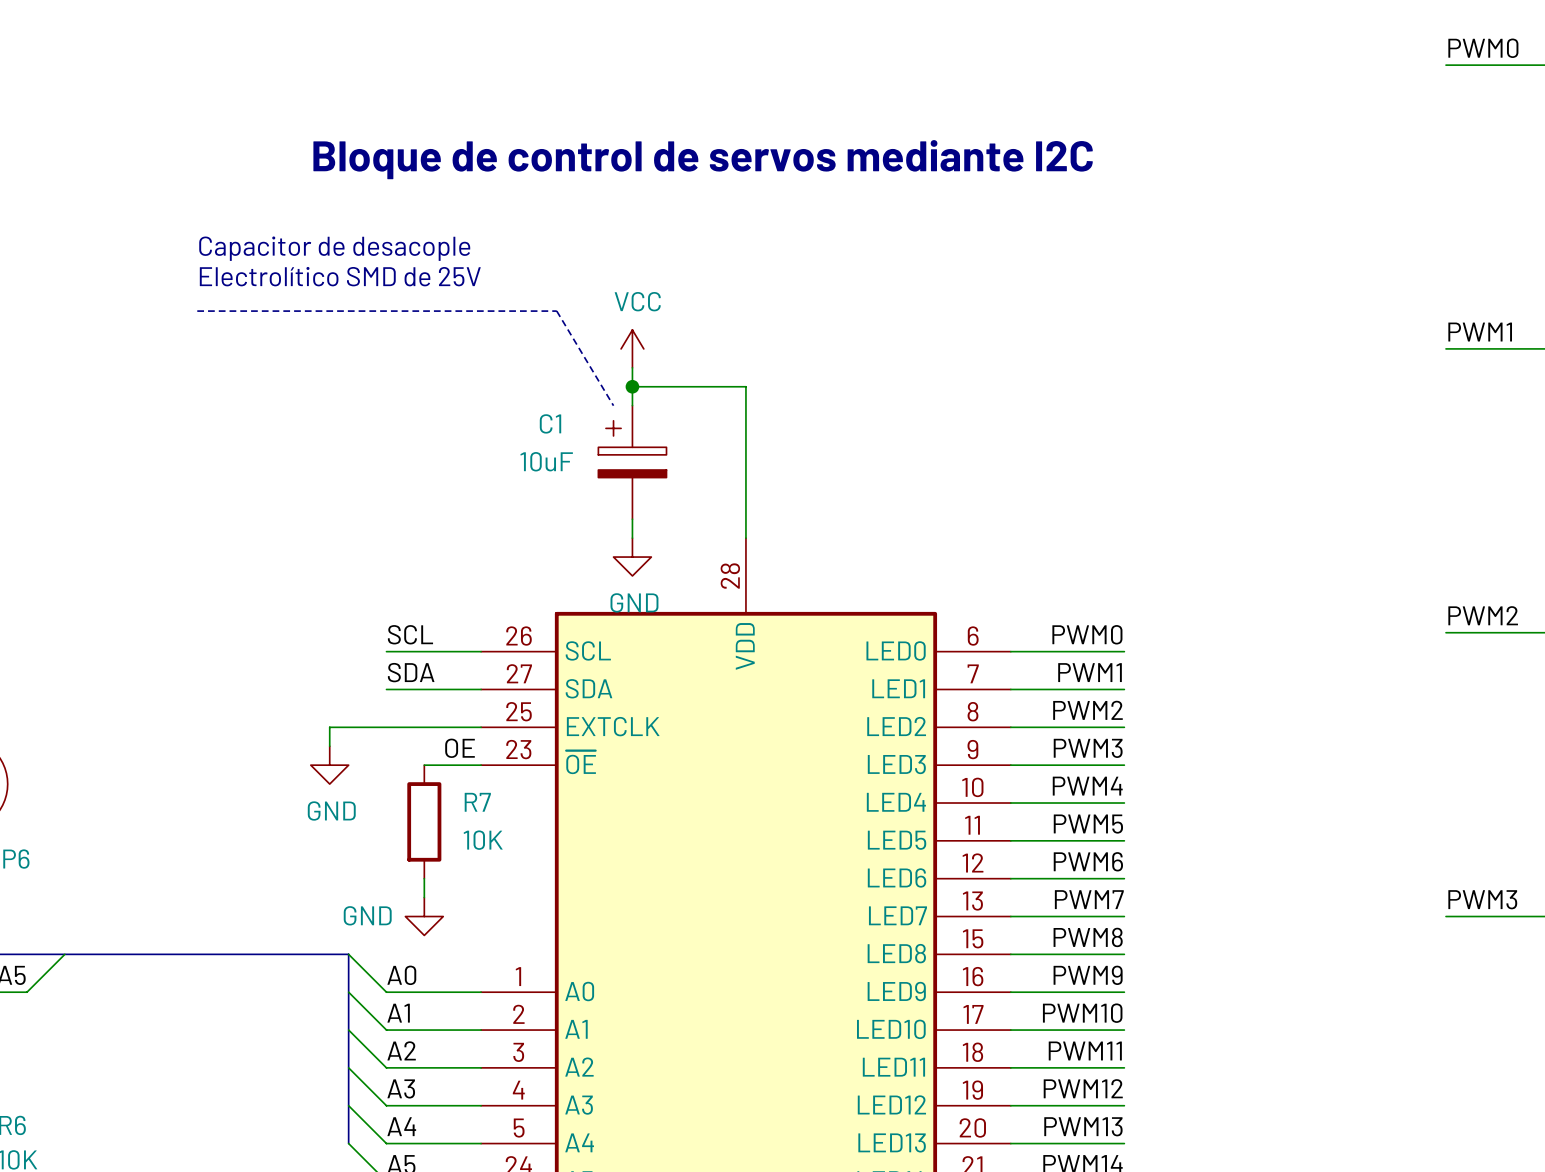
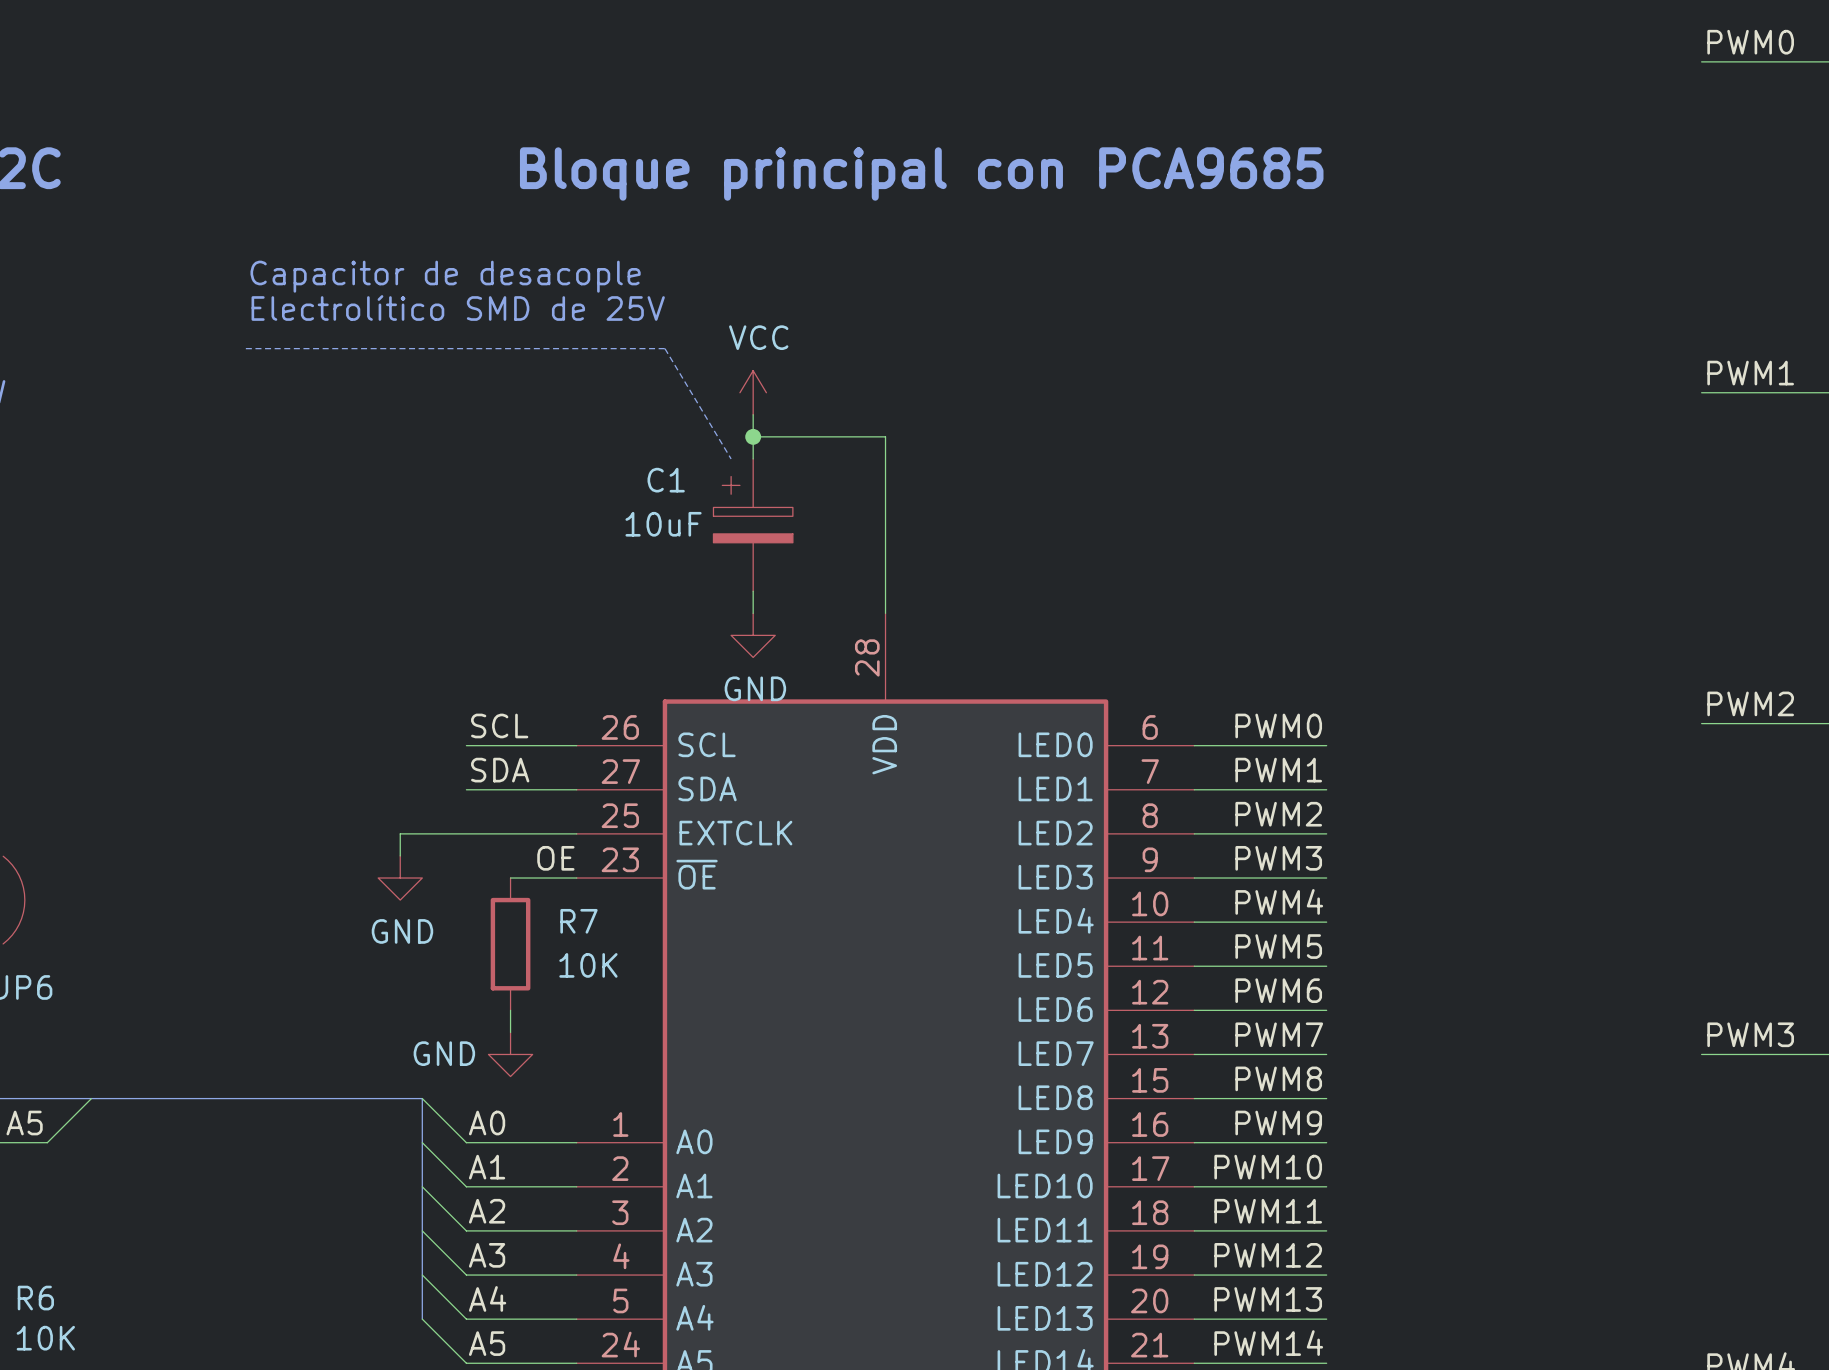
text: Bloque de control de servos mediante I2C (703, 159) -> none
text: none -> Bloque principal con PCA9685 (921, 174)

